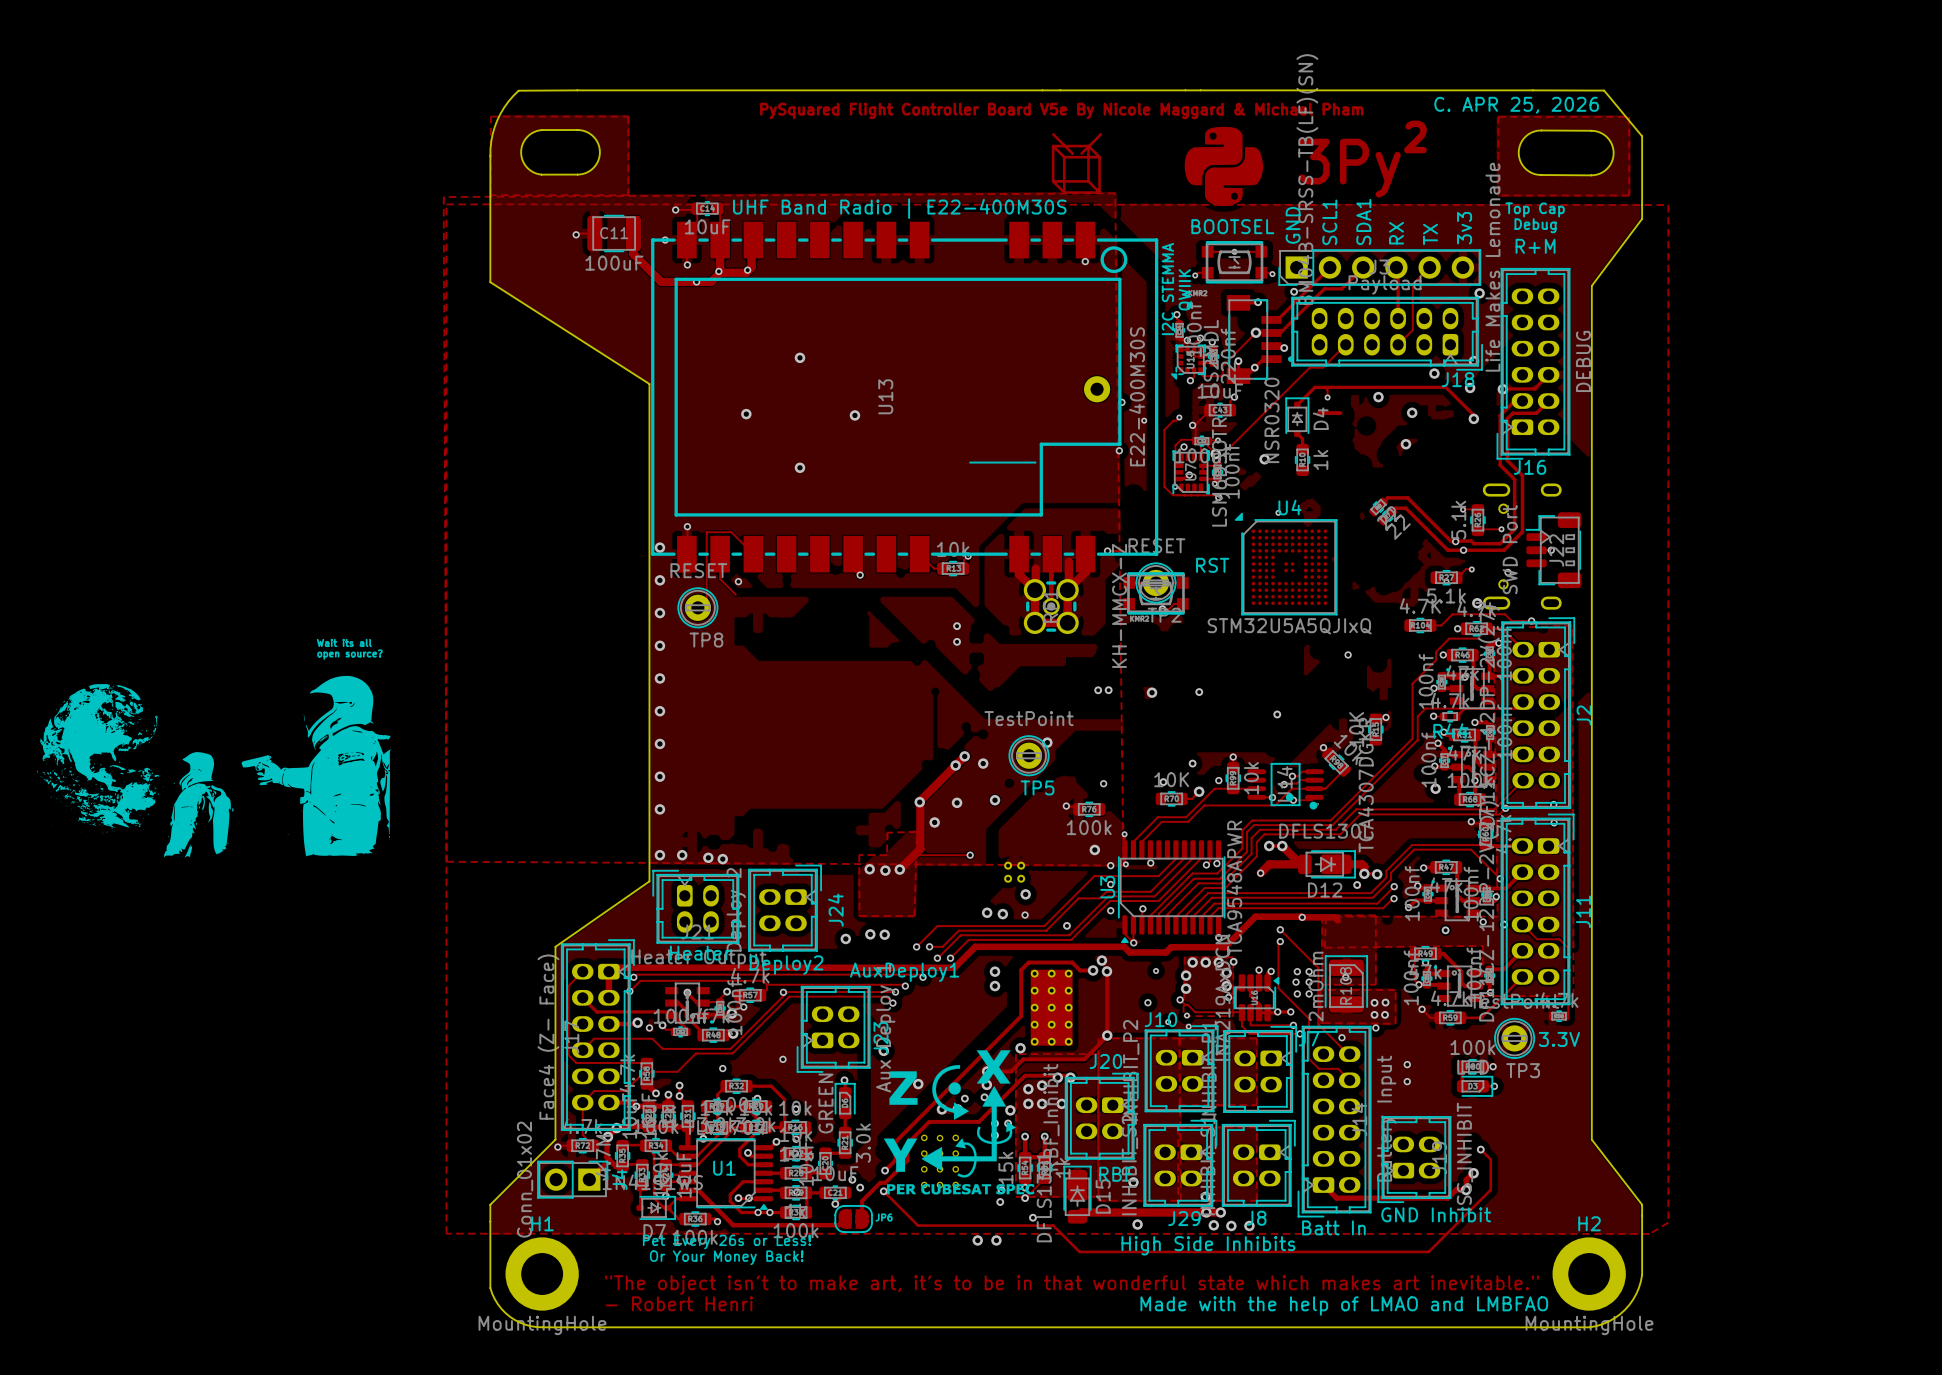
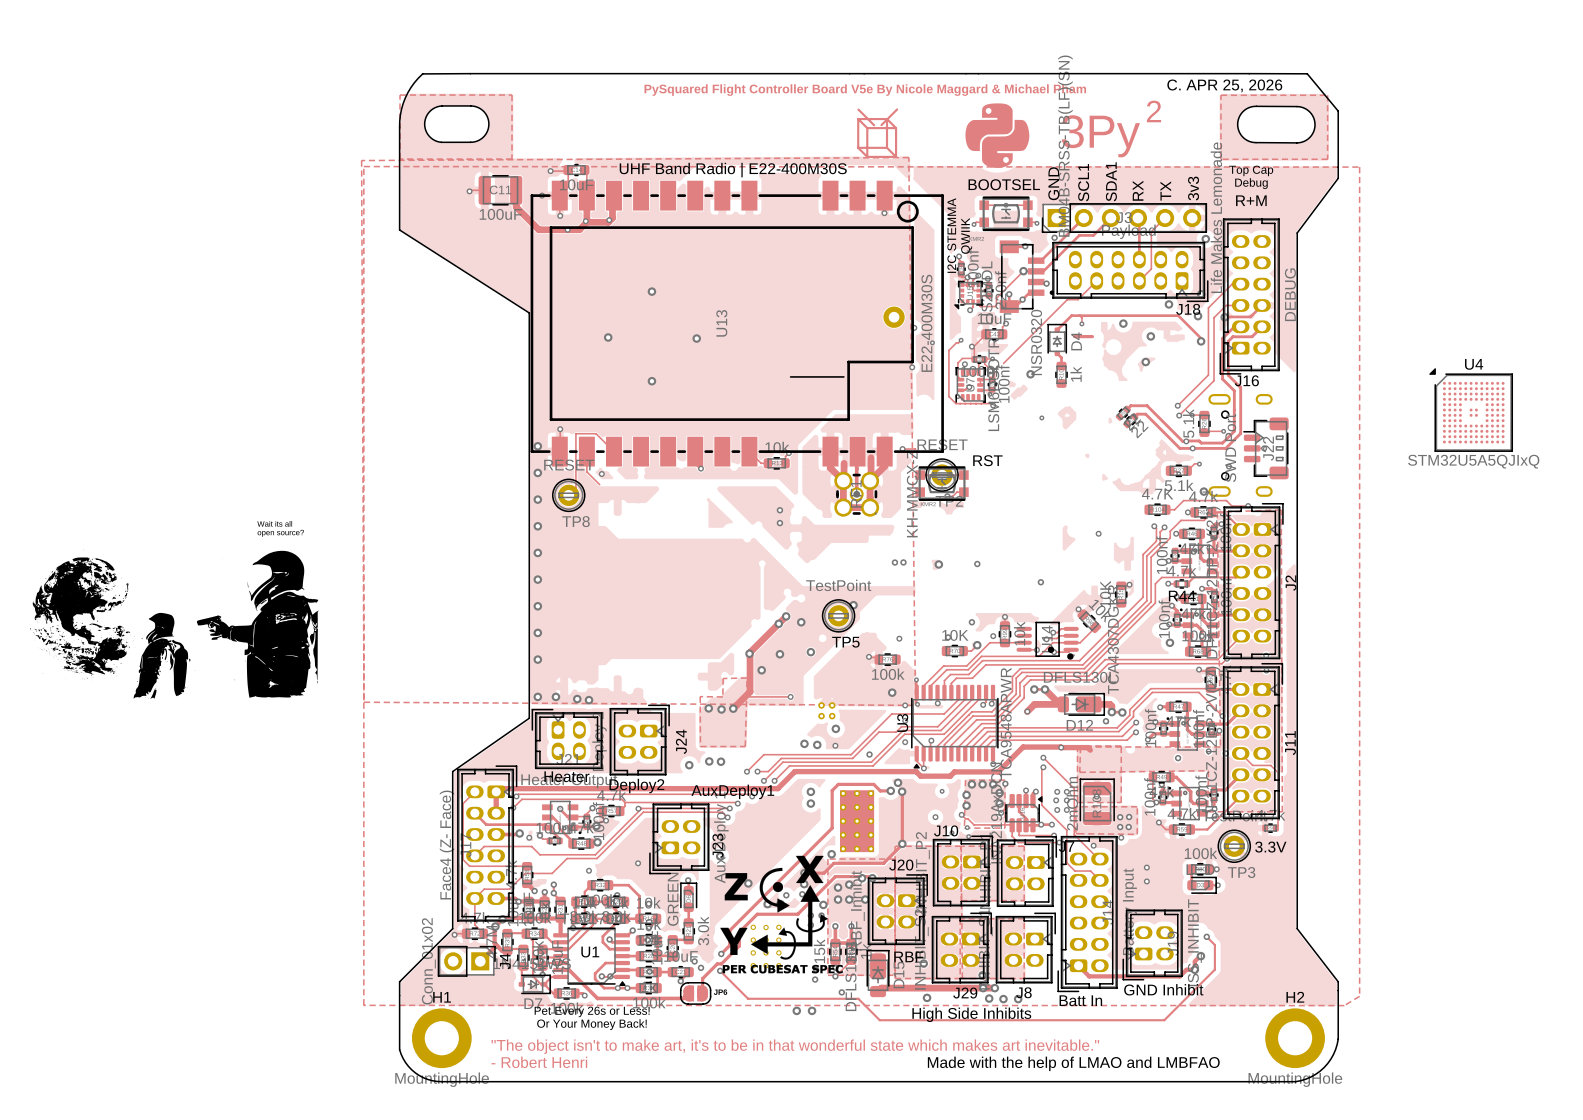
track: none -> (1232, 284) (1208, 307) (1208, 375) (1177, 405)
track: none -> (1240, 305) (1226, 305) (1214, 317) (1214, 380) (1179, 415)
via: none -> (1177, 405)
via: none -> (1179, 415)
U4 position: (1286, 563) -> (1471, 410)
track: none -> (1154, 526) (1156, 528) (1156, 541) (1143, 554) (1143, 597) (1079, 660) (982, 660) (968, 674) (950, 674) (944, 680) (944, 692)
via: none -> (1154, 526)
track: none -> (1164, 527) (1160, 531) (1160, 542) (1146, 556) (1146, 600) (1082, 664) (985, 664) (972, 678) (956, 678) (951, 683) (951, 692)
via: none -> (1164, 527)

